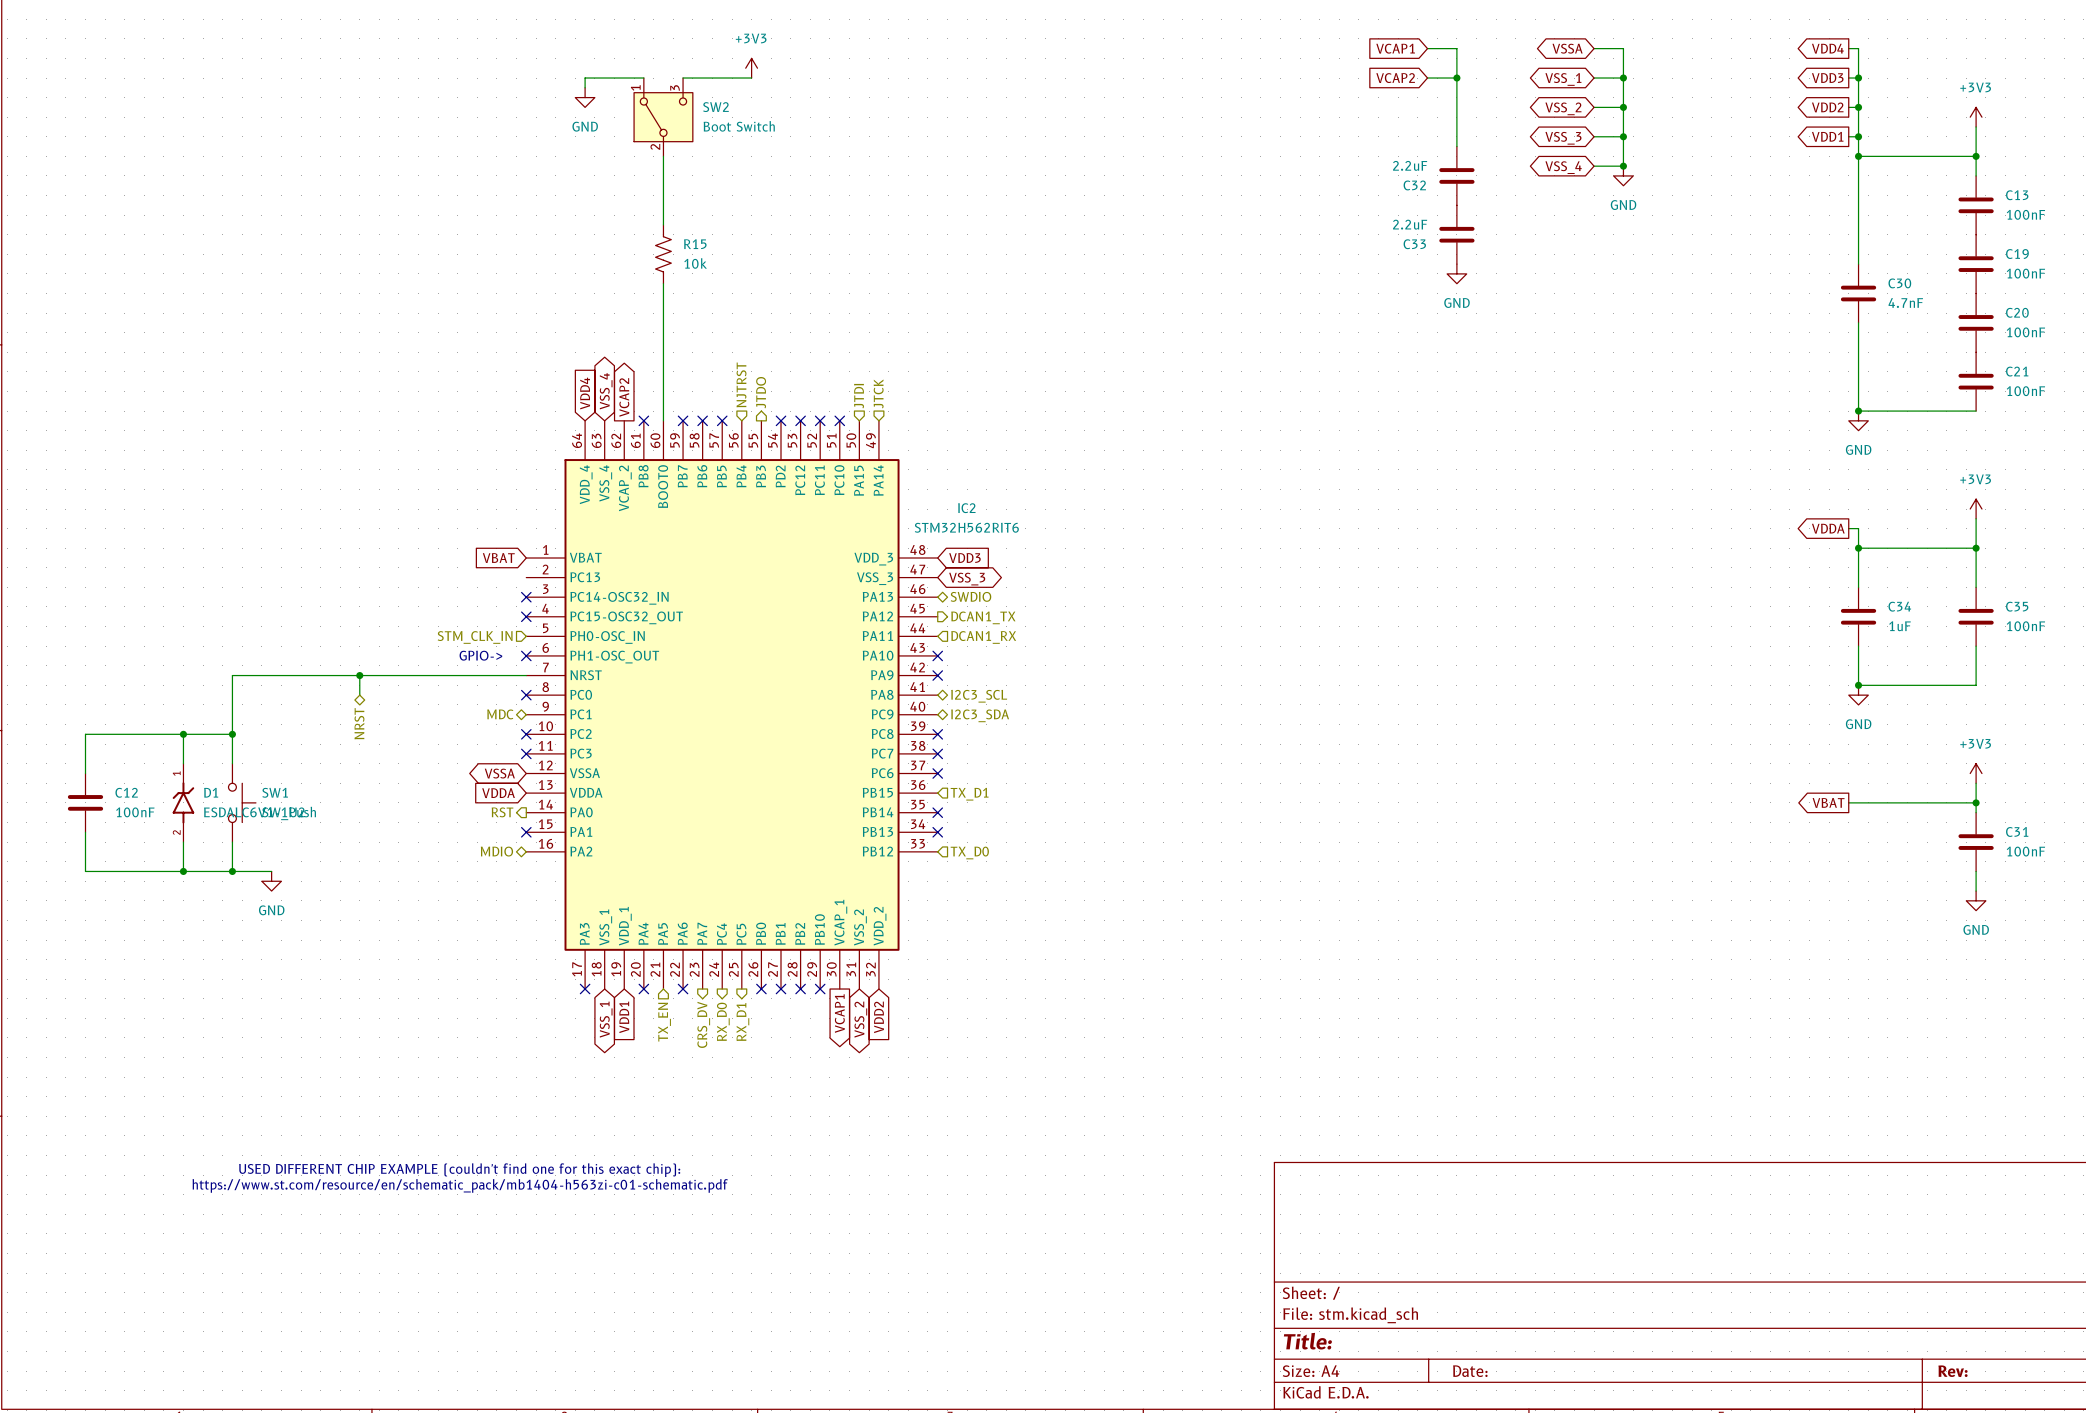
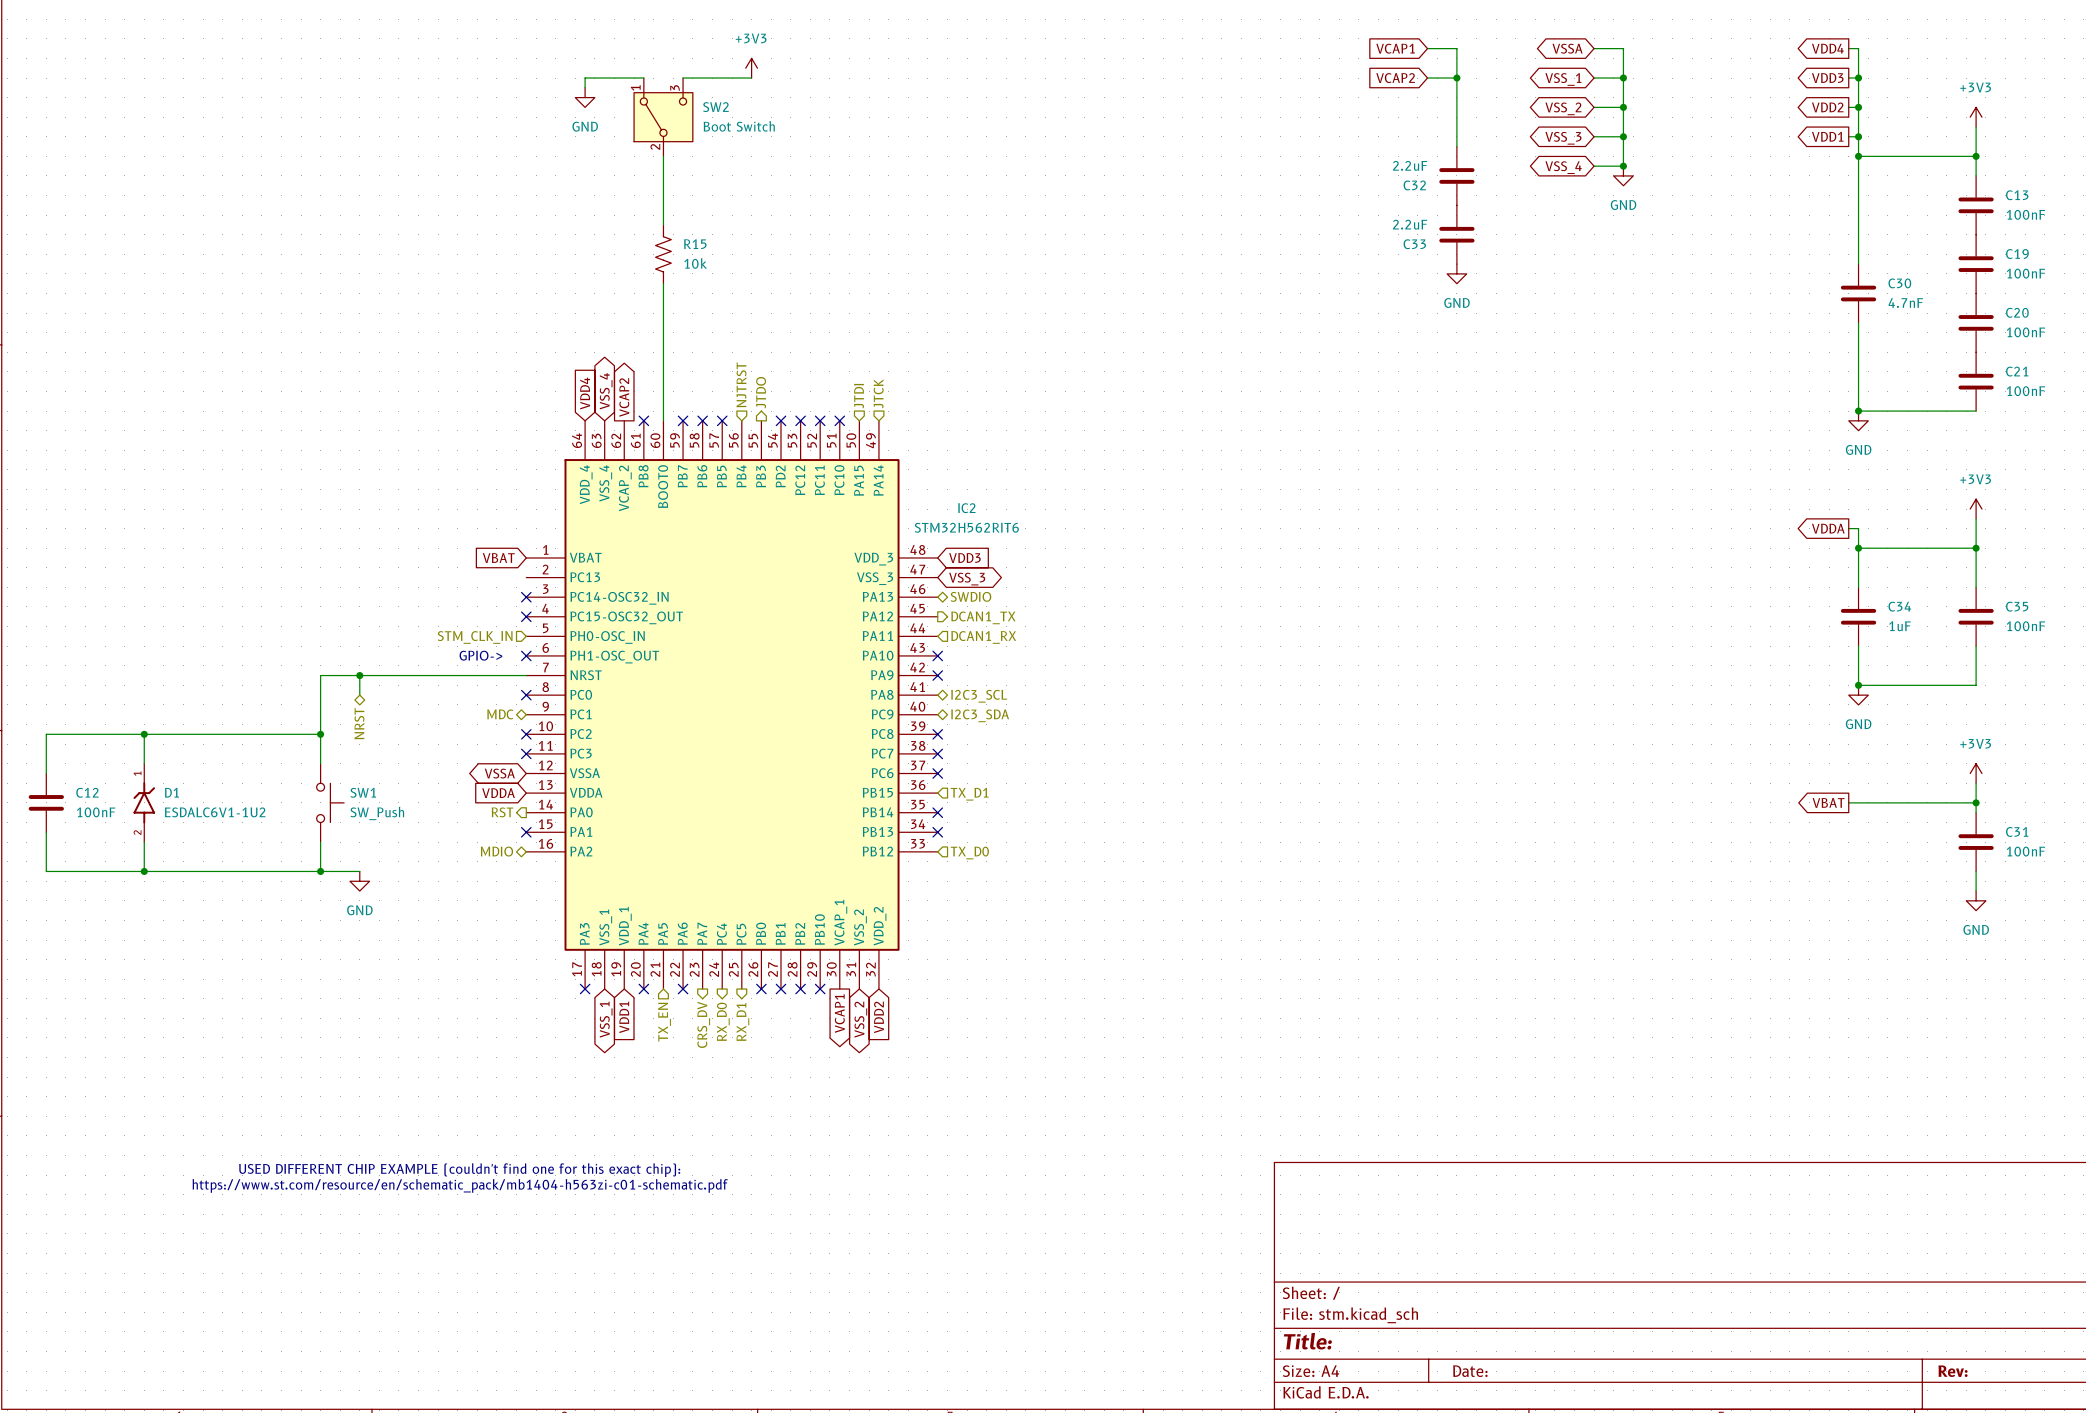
wire: (320, 675) (232, 675) (232, 763) -> (320, 675) (320, 763)
wire: (85, 734) (85, 773) -> (85, 734) (46, 734) (46, 773)
wire: (183, 734) (183, 763) -> (144, 734) (144, 763)
junction position: (183, 734) -> (144, 734)
wire: none -> (232, 734) (320, 734)
junction: (232, 734) -> none
junction: none -> (320, 734)
C12 position: (85, 802) -> (46, 802)
D1 position: (183, 802) -> (144, 802)
SW1 position: (242, 802) -> (330, 802)
wire: (85, 832) (85, 871) -> (46, 832) (46, 871) (85, 871)
wire: (183, 842) (183, 871) -> (144, 842) (144, 871)
wire: (232, 842) (232, 871) -> (320, 842) (320, 871)
junction position: (183, 871) -> (144, 871)
junction: (232, 871) -> none
wire: none -> (271, 871) (359, 871)
junction: none -> (320, 871)
power symbol position: GND (271, 881) -> GND (359, 881)

